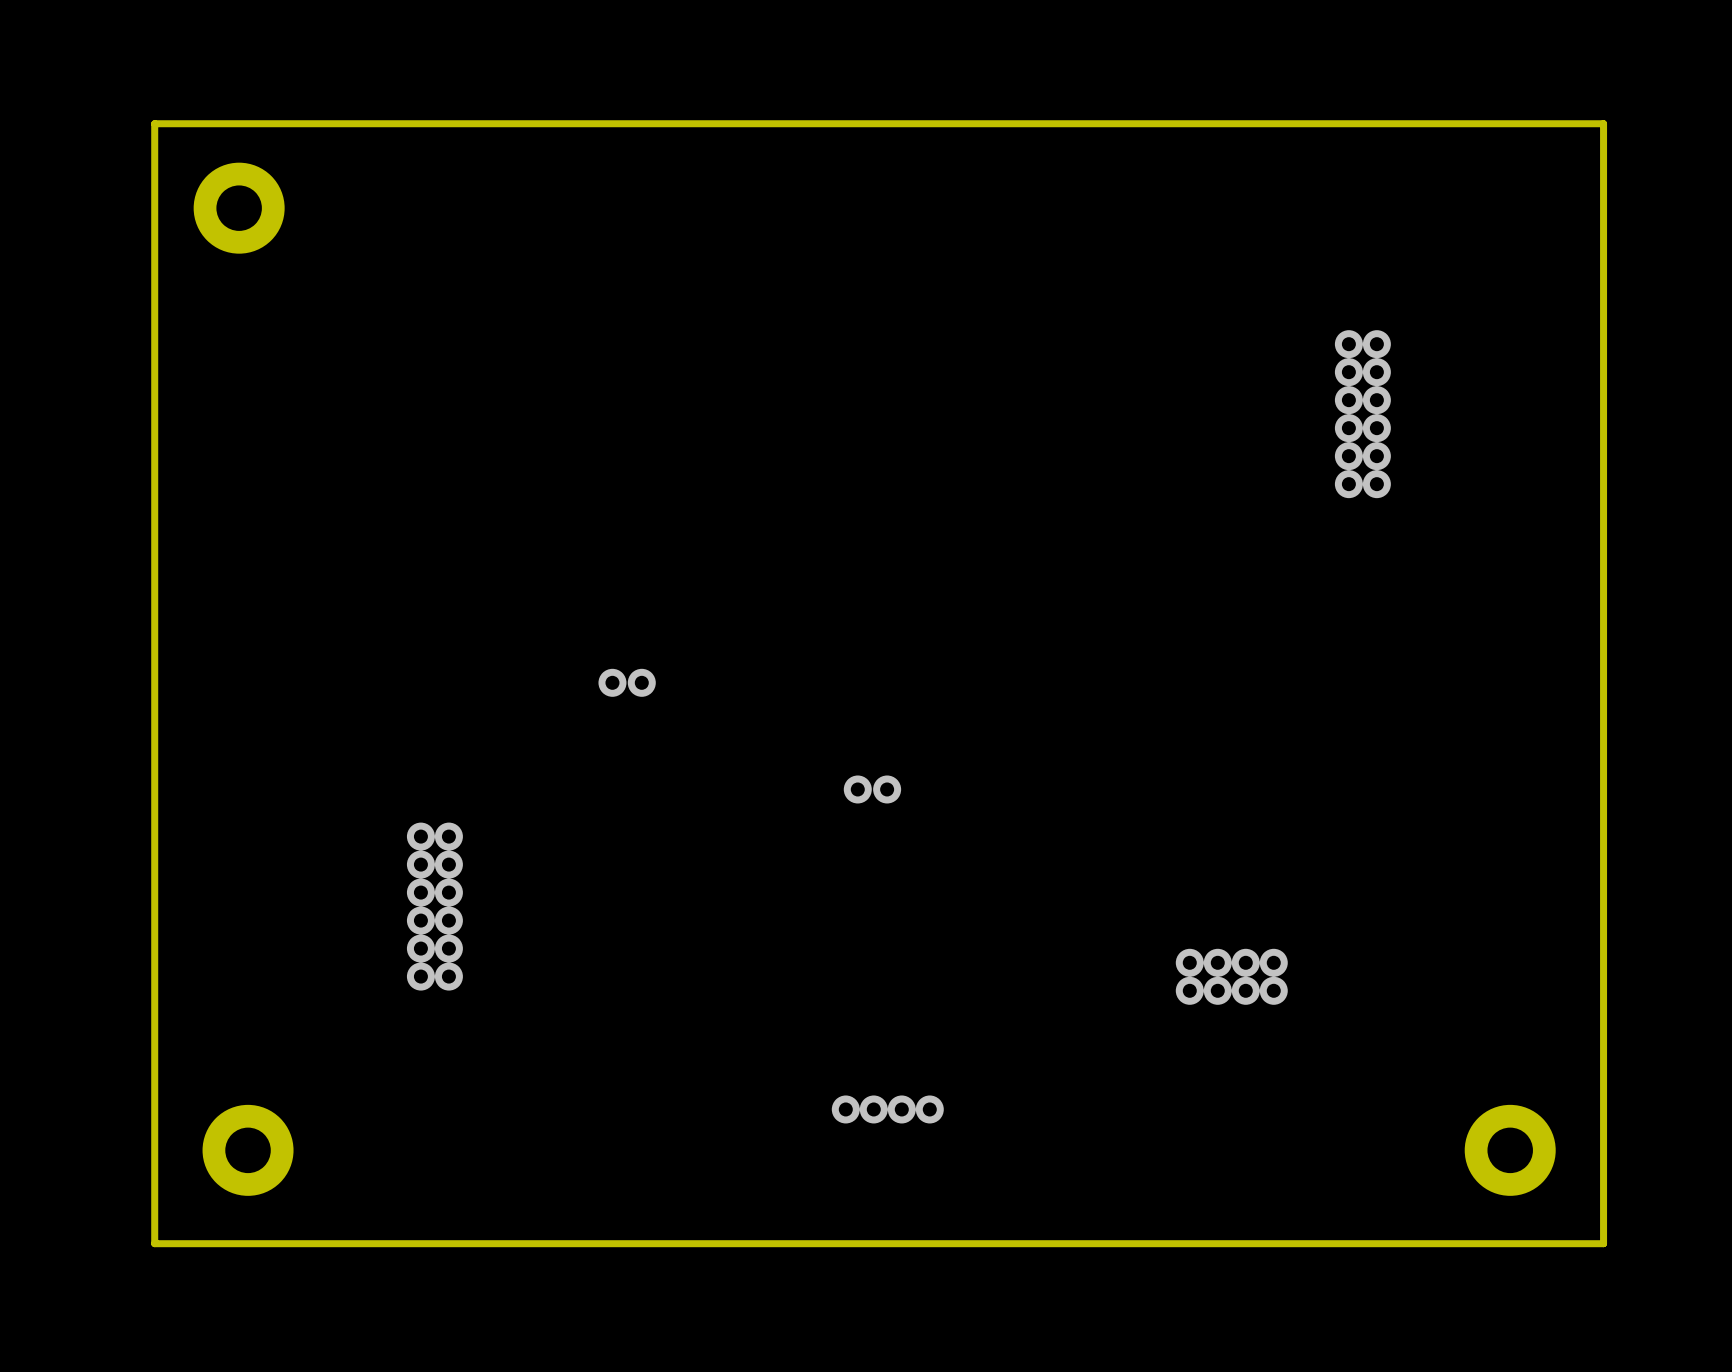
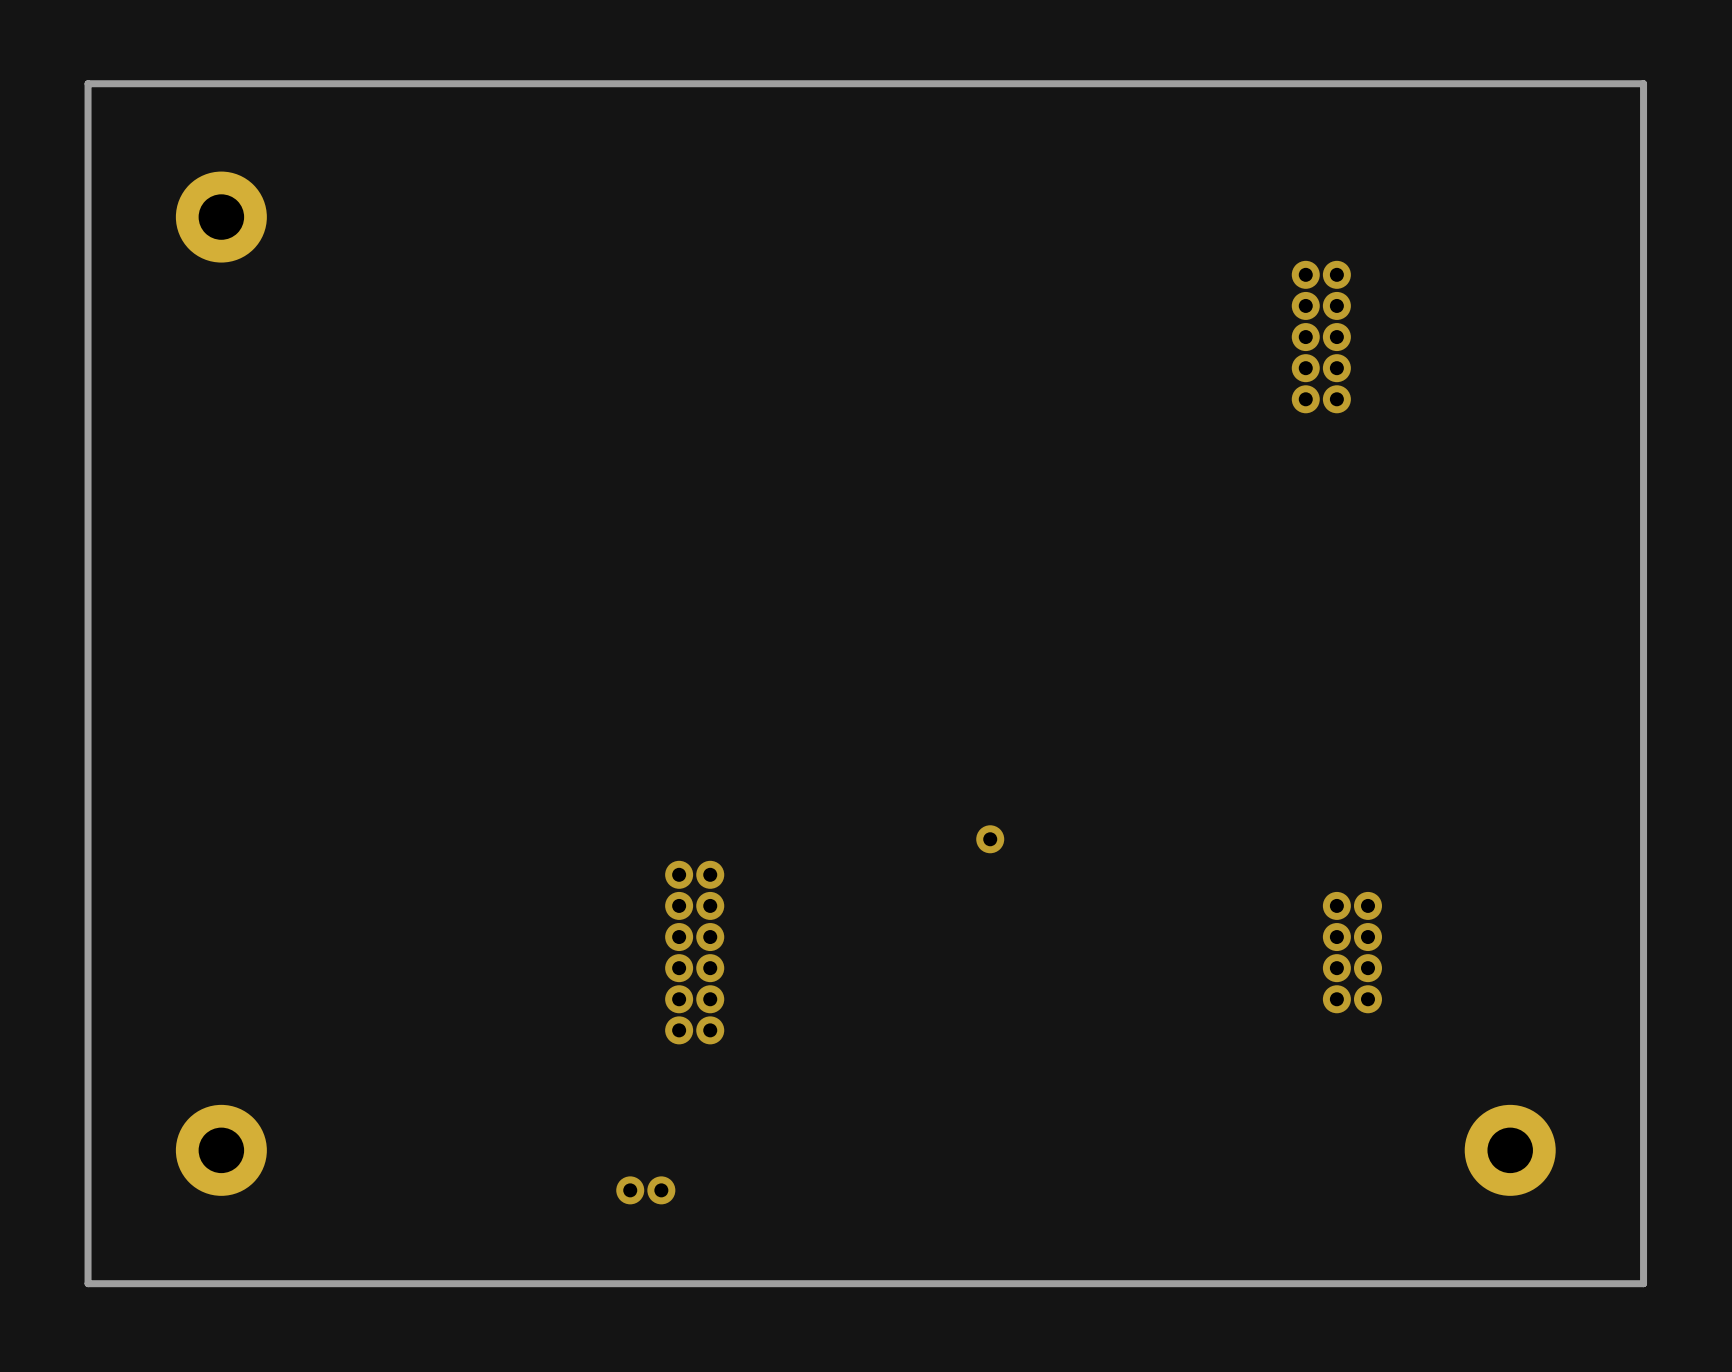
board edge: (1603, 123) (1603, 1243) (154, 1243) (154, 123) (1603, 123) -> (1643, 83) (1643, 1283) (88, 1283) (88, 83) (1643, 83)
part position: (239, 208) -> (221, 217)
via: none -> (1305, 274)
via: none -> (1336, 274)
via: none -> (1305, 305)
via: none -> (1336, 305)
via: none -> (1305, 337)
via position: (1348, 344) -> (1336, 337)
via: (1376, 344) -> none
via: none -> (1305, 368)
via position: (1348, 372) -> (1336, 368)
via: (1376, 372) -> none
via: none -> (1305, 399)
via position: (1348, 400) -> (1336, 399)
via: (1376, 400) -> none
via: (1348, 428) -> none
via: (1376, 428) -> none
via: (1348, 456) -> none
via: (1376, 456) -> none
via: (1348, 484) -> none
via: (1376, 484) -> none
via: (612, 682) -> none
via: (641, 682) -> none
via: (857, 789) -> none
via: (887, 789) -> none
via: (420, 836) -> none
via: (448, 836) -> none
via: none -> (990, 839)
via: (420, 864) -> none
via: (448, 864) -> none
via: none -> (679, 874)
via: none -> (710, 874)
via: (420, 892) -> none
via: (448, 892) -> none
via: none -> (679, 905)
via: none -> (710, 905)
via: none -> (1336, 905)
via: none -> (1368, 905)
via: (420, 920) -> none
via: (448, 920) -> none
via: none -> (679, 937)
via: none -> (710, 937)
via: none -> (1336, 937)
via: none -> (1368, 937)
via: (420, 948) -> none
via: (448, 948) -> none
via: (1189, 962) -> none
via: (1217, 962) -> none
via: (1245, 962) -> none
via: (1273, 962) -> none
via: none -> (679, 968)
via: none -> (710, 968)
via: none -> (1336, 968)
via: none -> (1368, 968)
via: (420, 976) -> none
via: (448, 976) -> none
via: (1189, 990) -> none
via: (1217, 990) -> none
via: (1245, 990) -> none
via: (1273, 990) -> none
via: none -> (679, 999)
via: none -> (710, 999)
via: none -> (1336, 999)
via: none -> (1368, 999)
via: none -> (679, 1030)
via: none -> (710, 1030)
via: (845, 1109) -> none
via: (873, 1109) -> none
via: (901, 1109) -> none
via: (929, 1109) -> none
part position: (248, 1150) -> (221, 1150)
via: none -> (630, 1190)
via: none -> (661, 1190)

